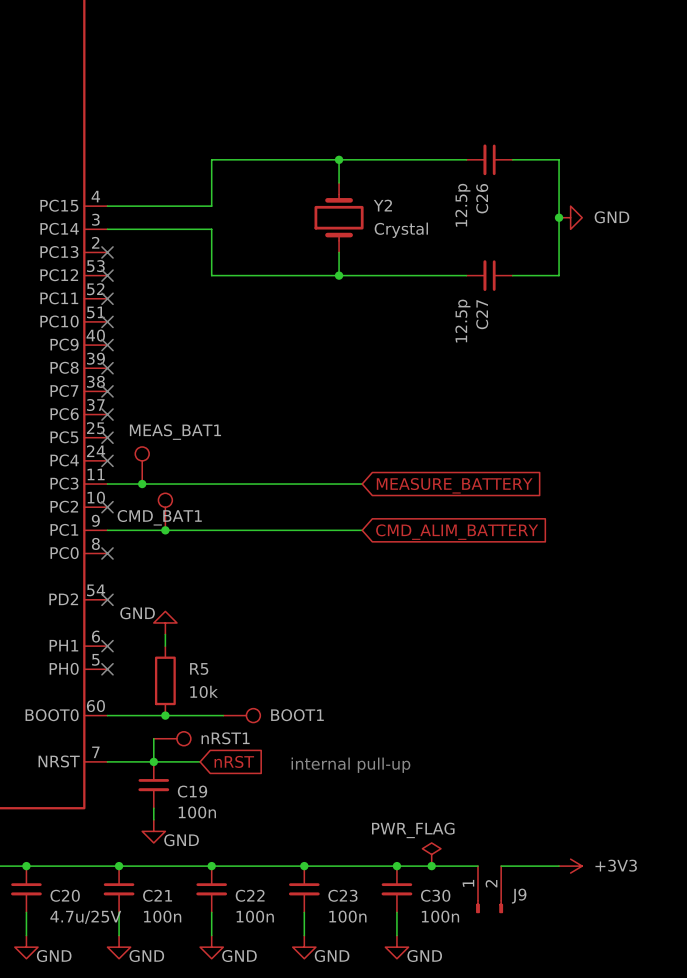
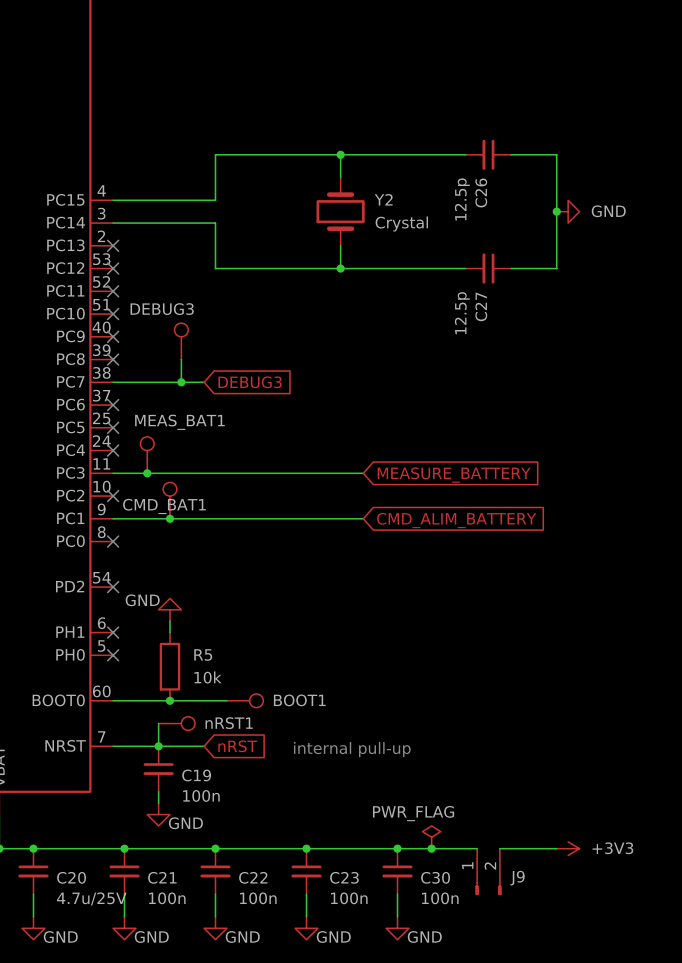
DEBUG3: none -> (181, 341)
wire: none -> (181, 359) (181, 382)
wire: none -> (113, 382) (204, 382)
no-connect mark: (107, 391) -> none
junction: none -> (181, 382)
global label: none -> DEBUG3 (250, 382)

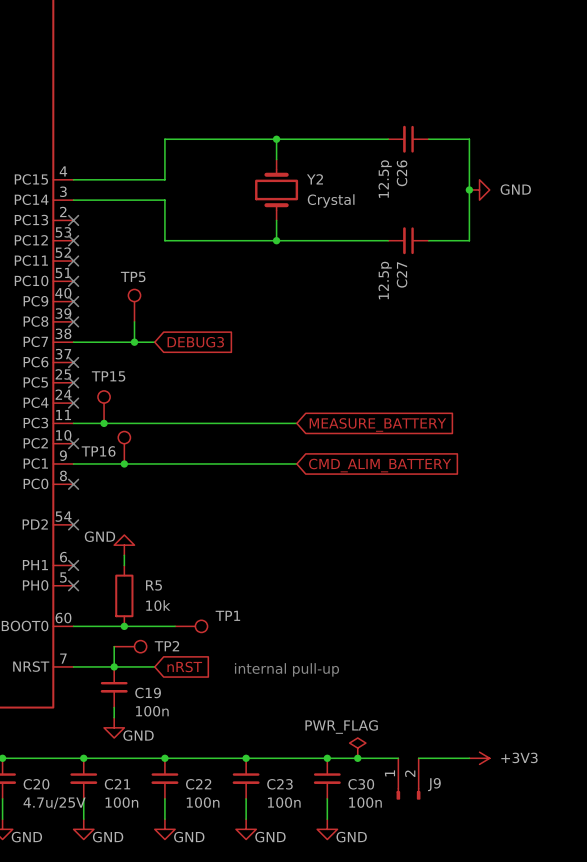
DEBUG3 name: DEBUG3 (162, 309) -> TP5 (133, 276)
MEAS_BAT1 name: MEAS_BAT1 (179, 422) -> TP15 (108, 376)
CMD_BAT1 name: CMD_BAT1 (164, 506) -> TP16 (98, 451)
BOOT1 name: BOOT1 (299, 700) -> TP1 (227, 615)
nRST1 name: nRST1 (229, 723) -> TP2 (166, 646)

